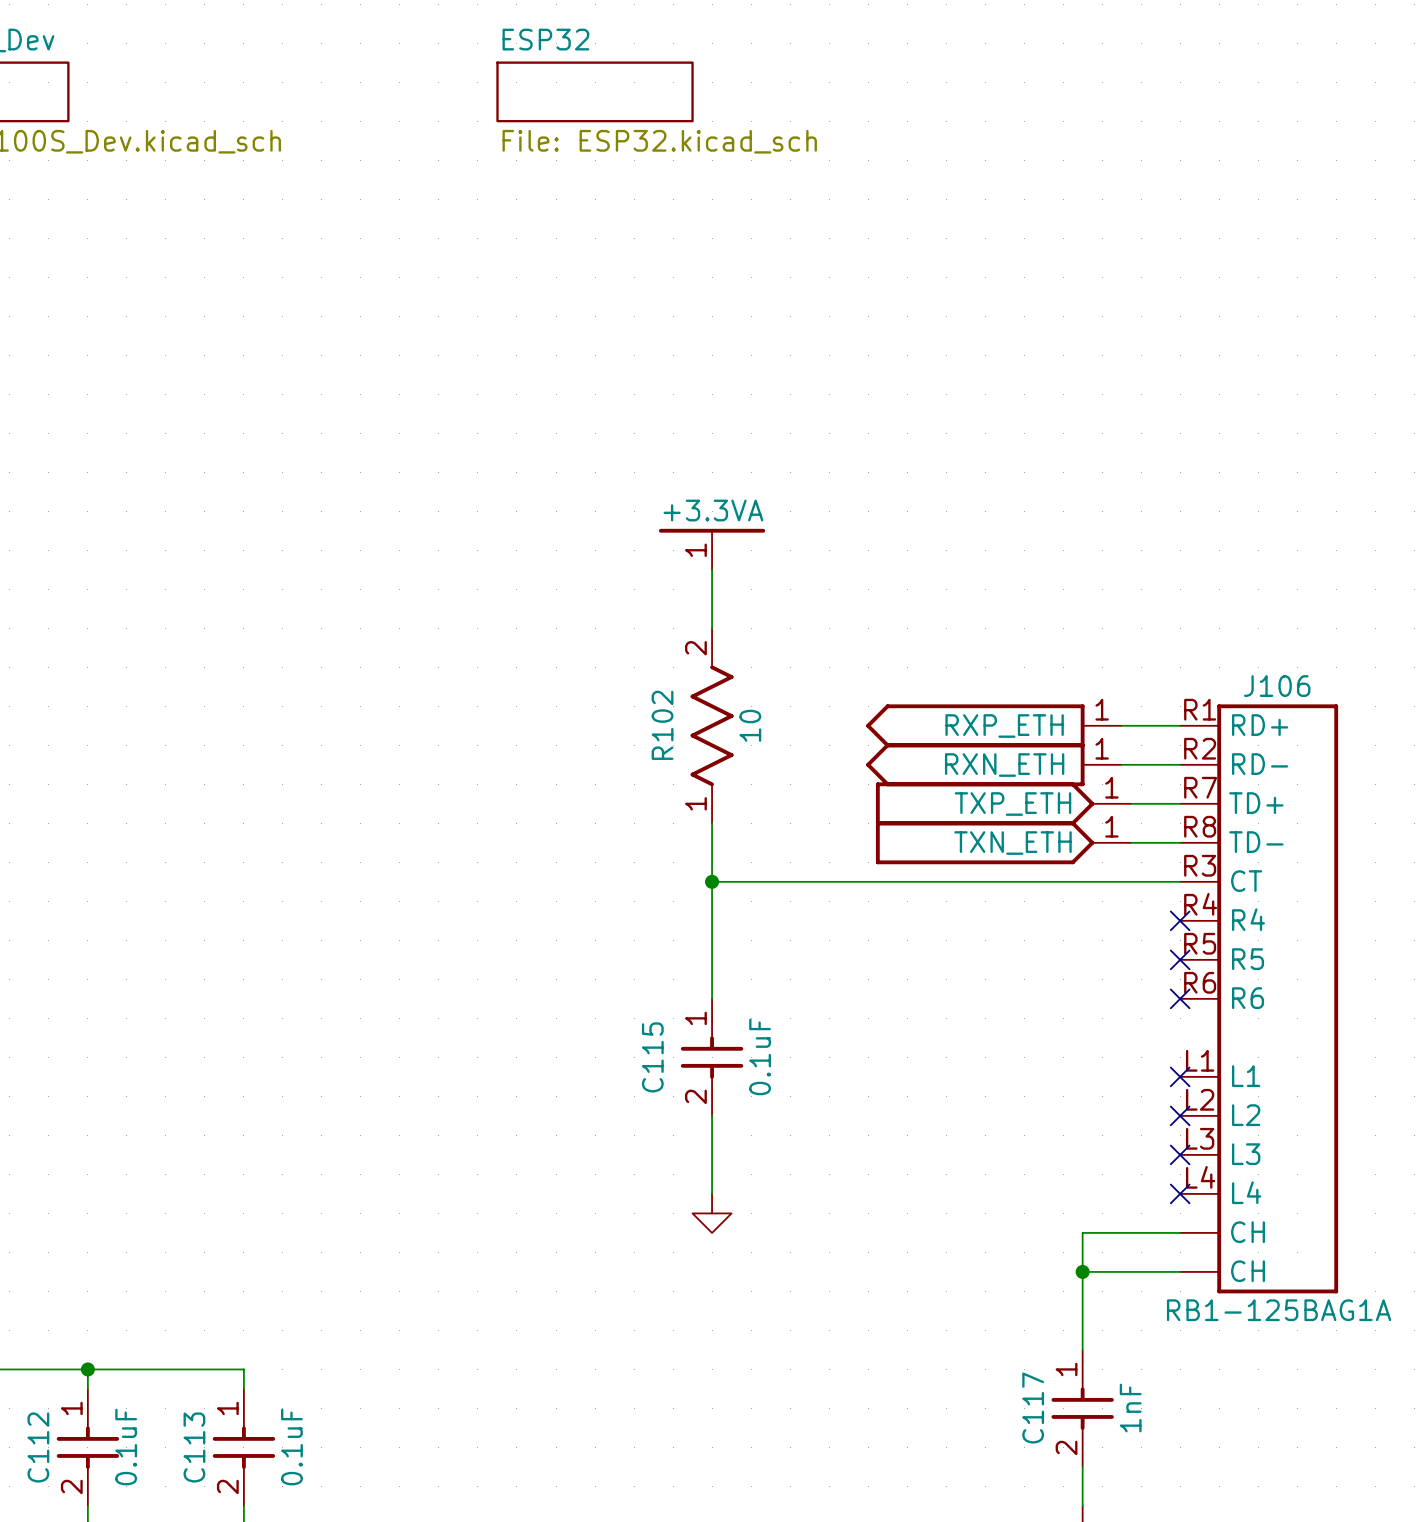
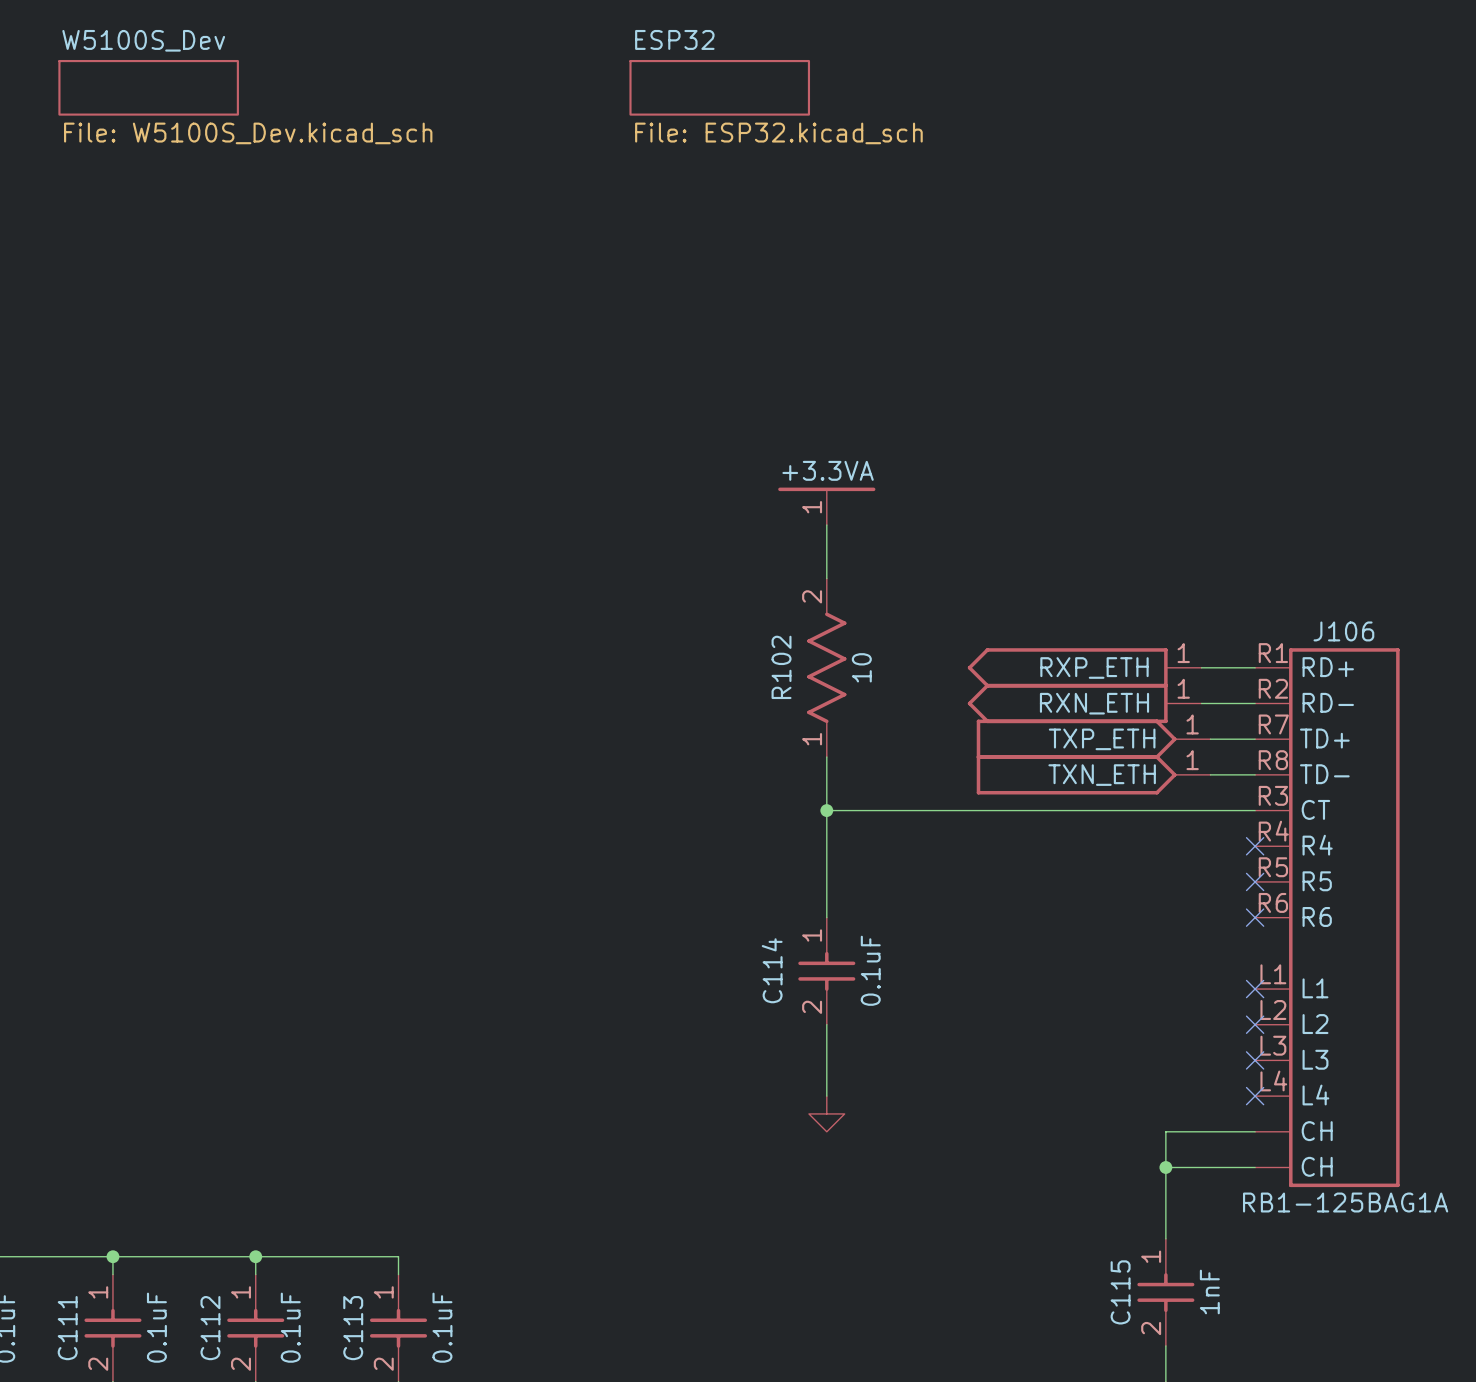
C115 name: C115 (652, 1057) -> C114 (772, 970)
C117 name: C117 (1033, 1408) -> C115 (1120, 1292)

